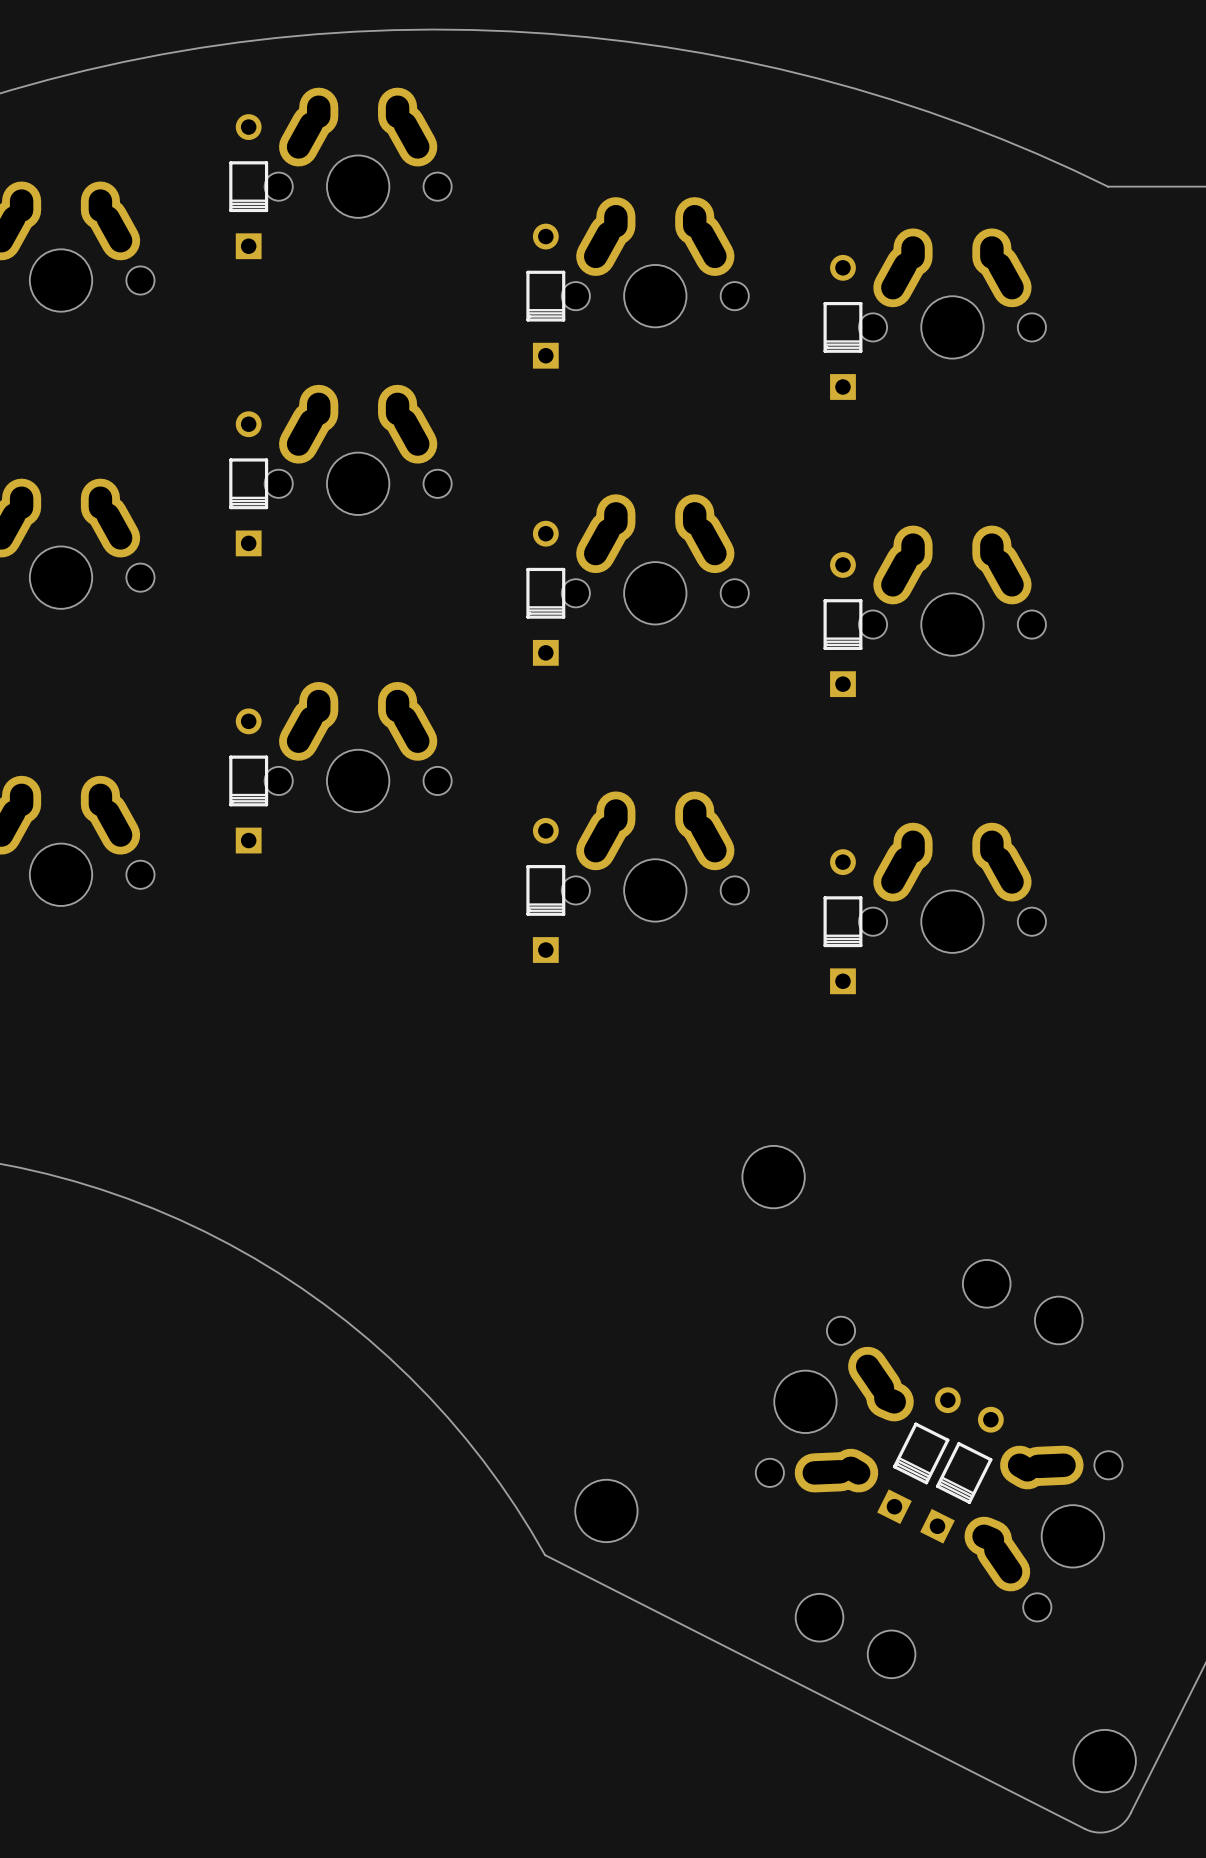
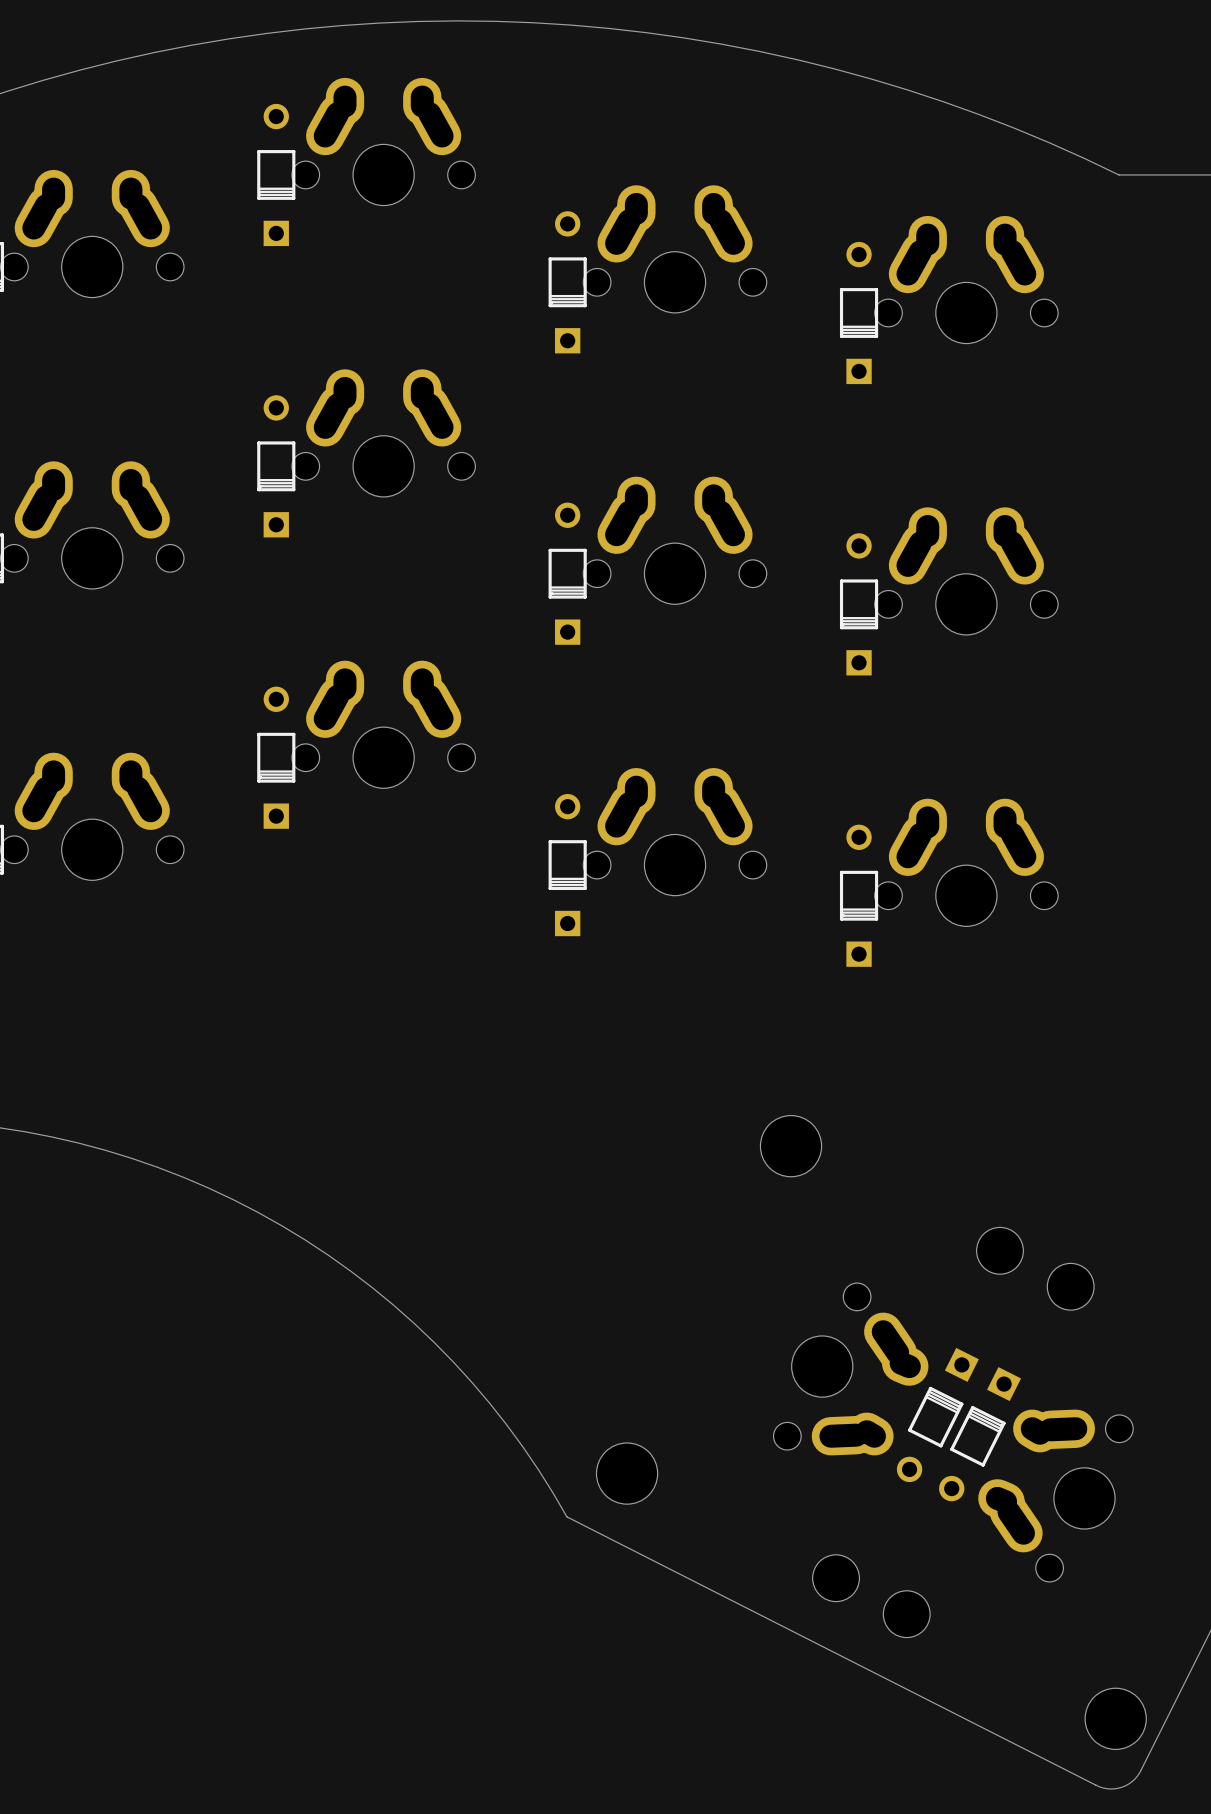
part rotation: 0° (918, 1455) -> 180° (937, 1414)
part rotation: 0° (961, 1475) -> 180° (980, 1434)

